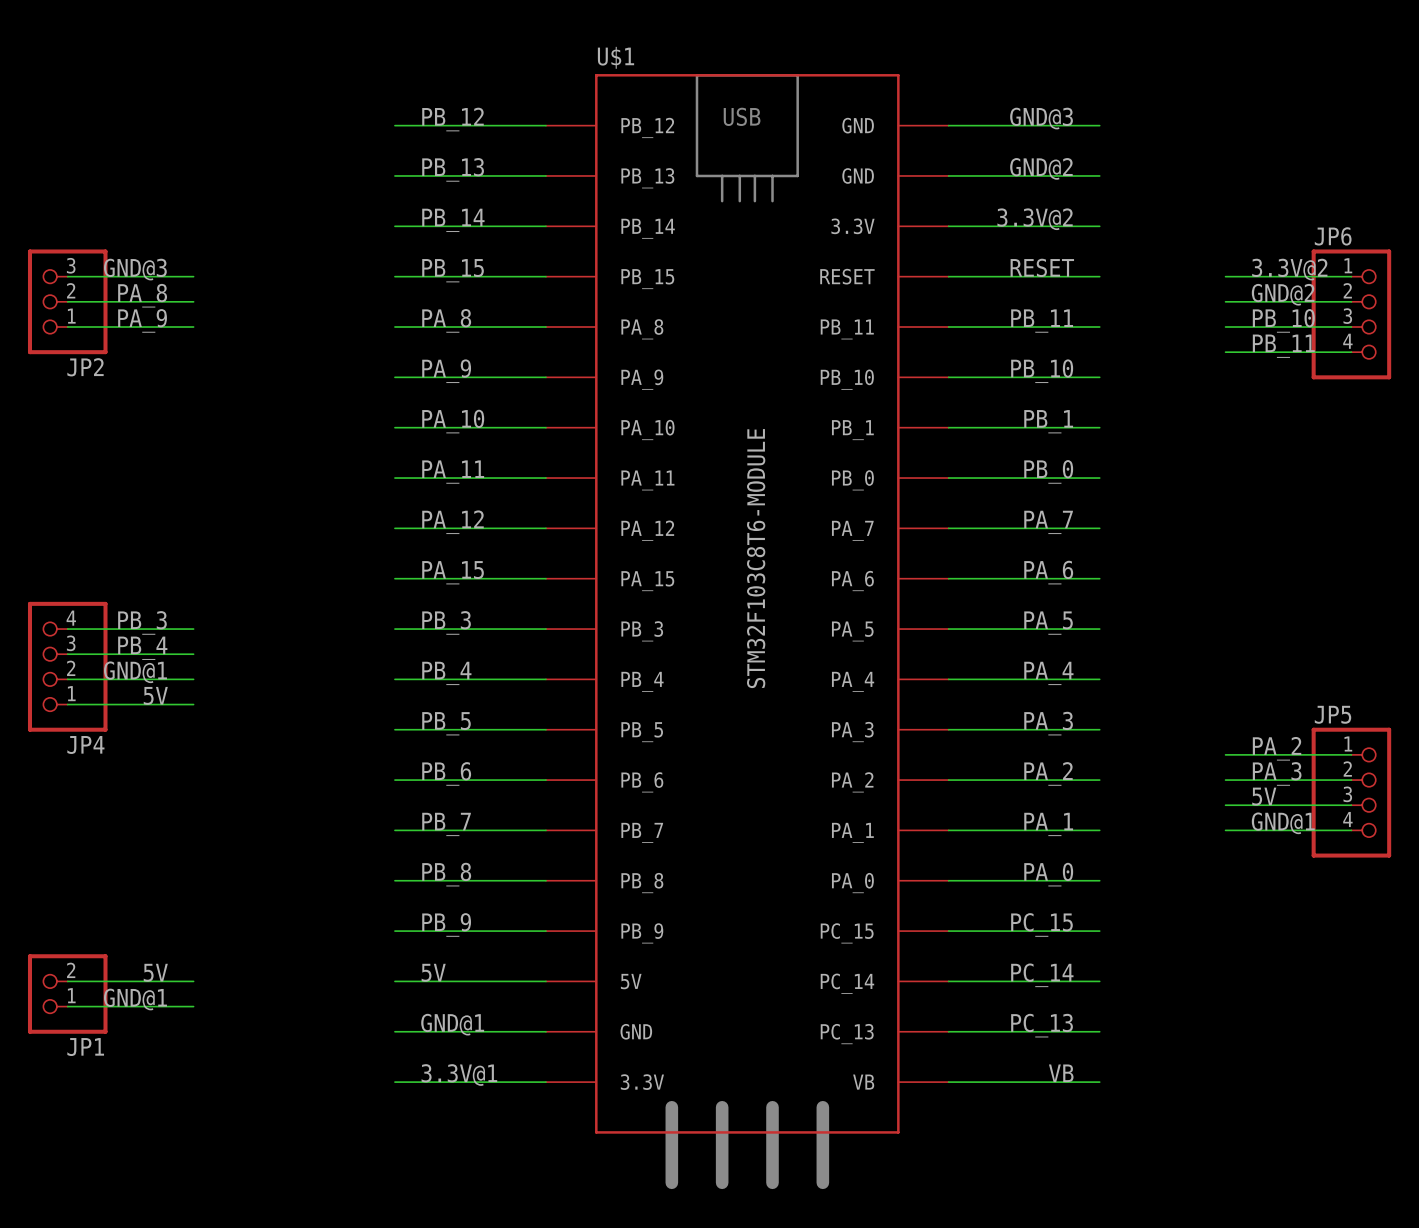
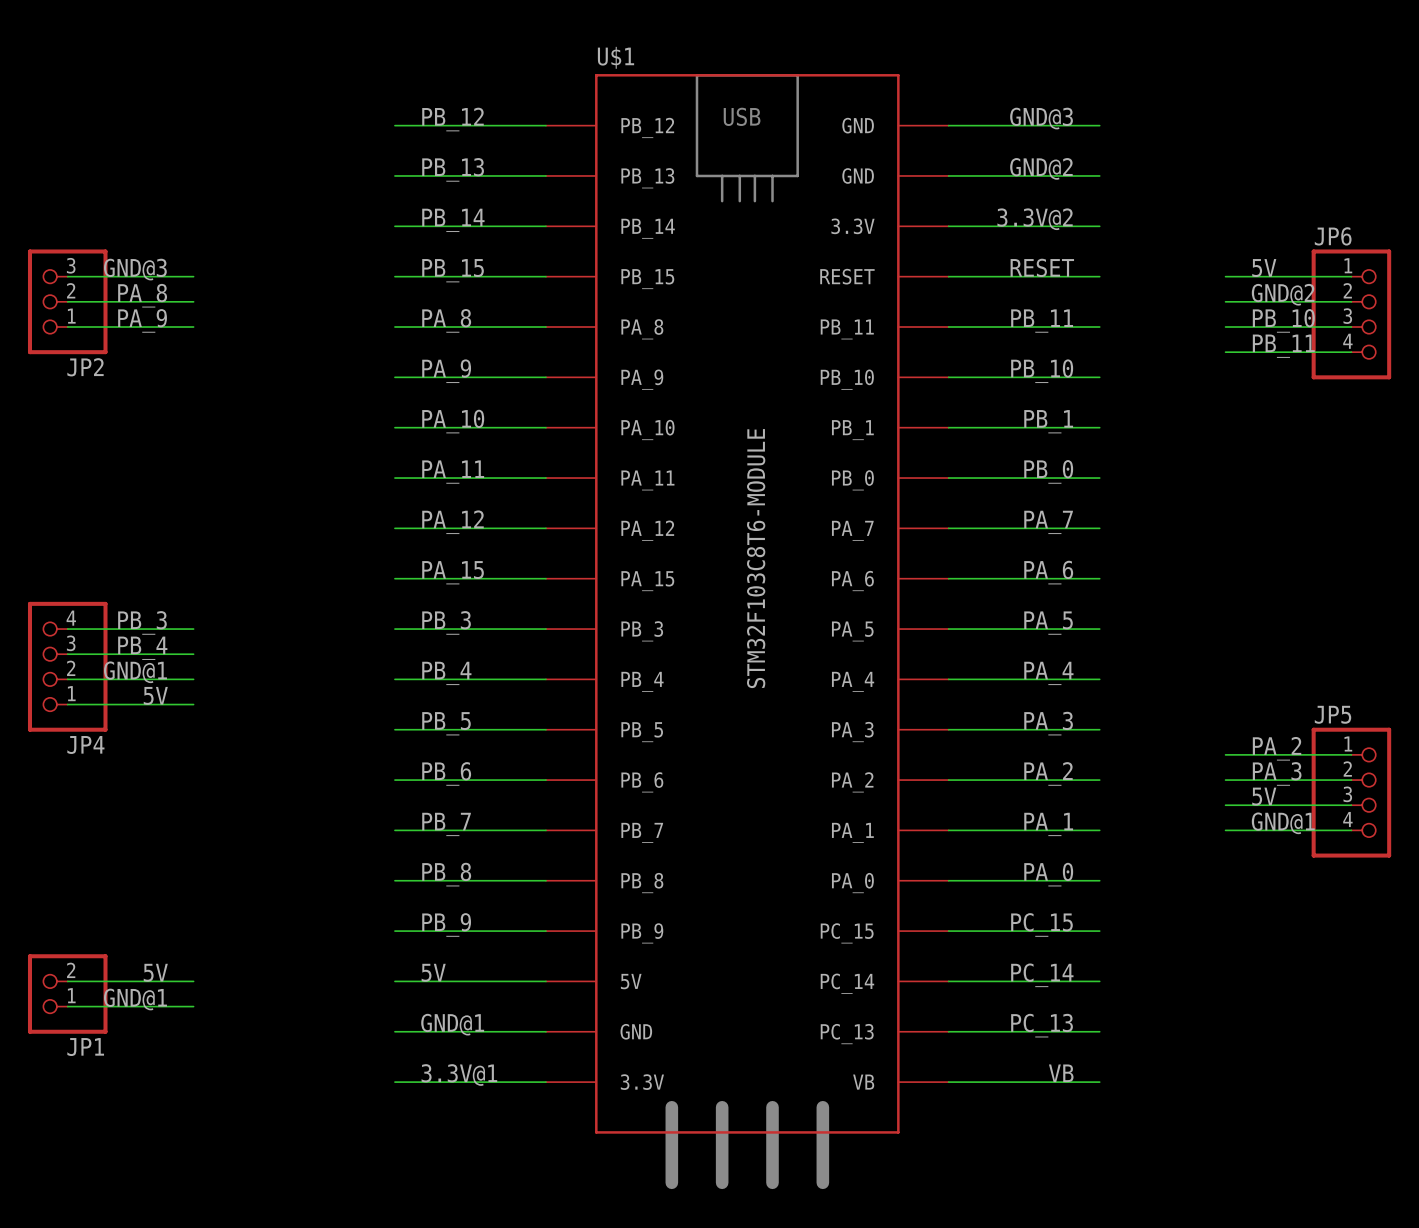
label: 3.3V@2 (1289, 269) -> 5V (1264, 268)

